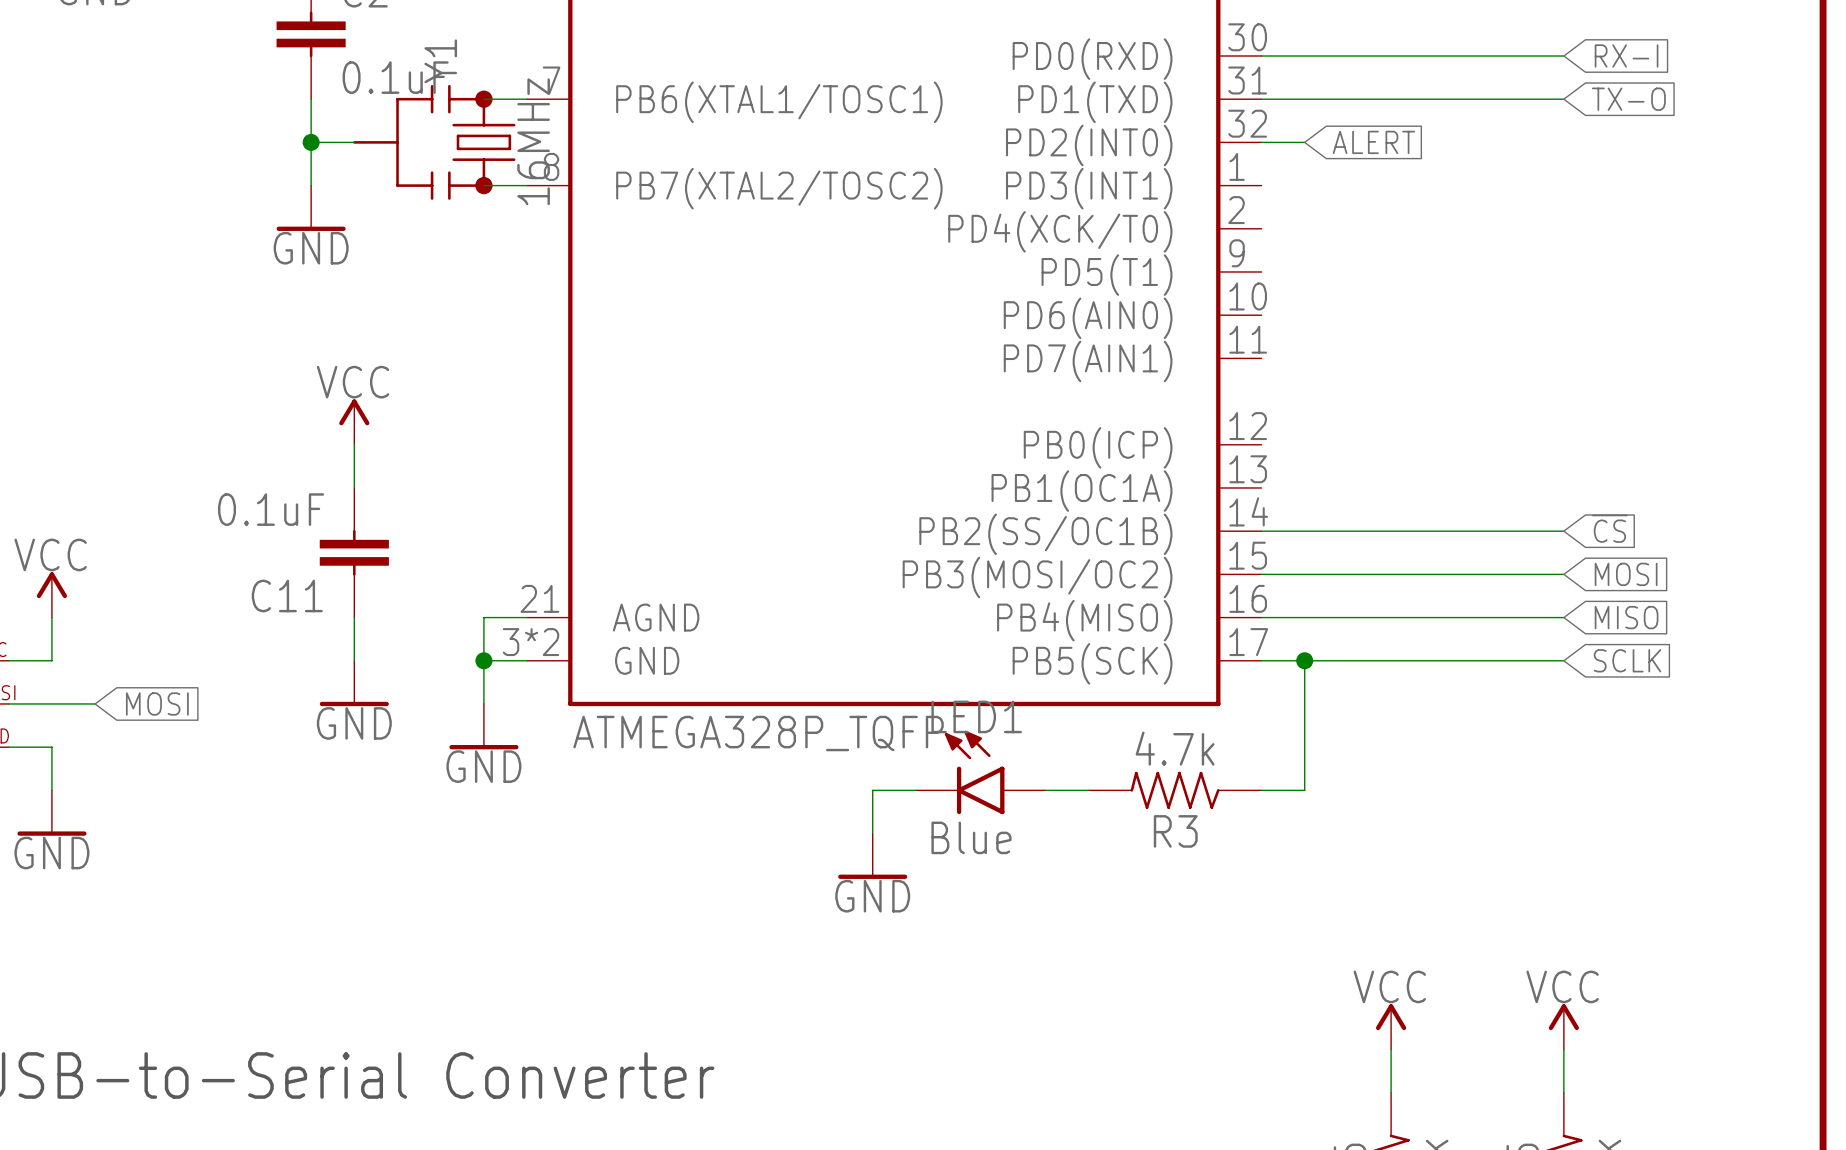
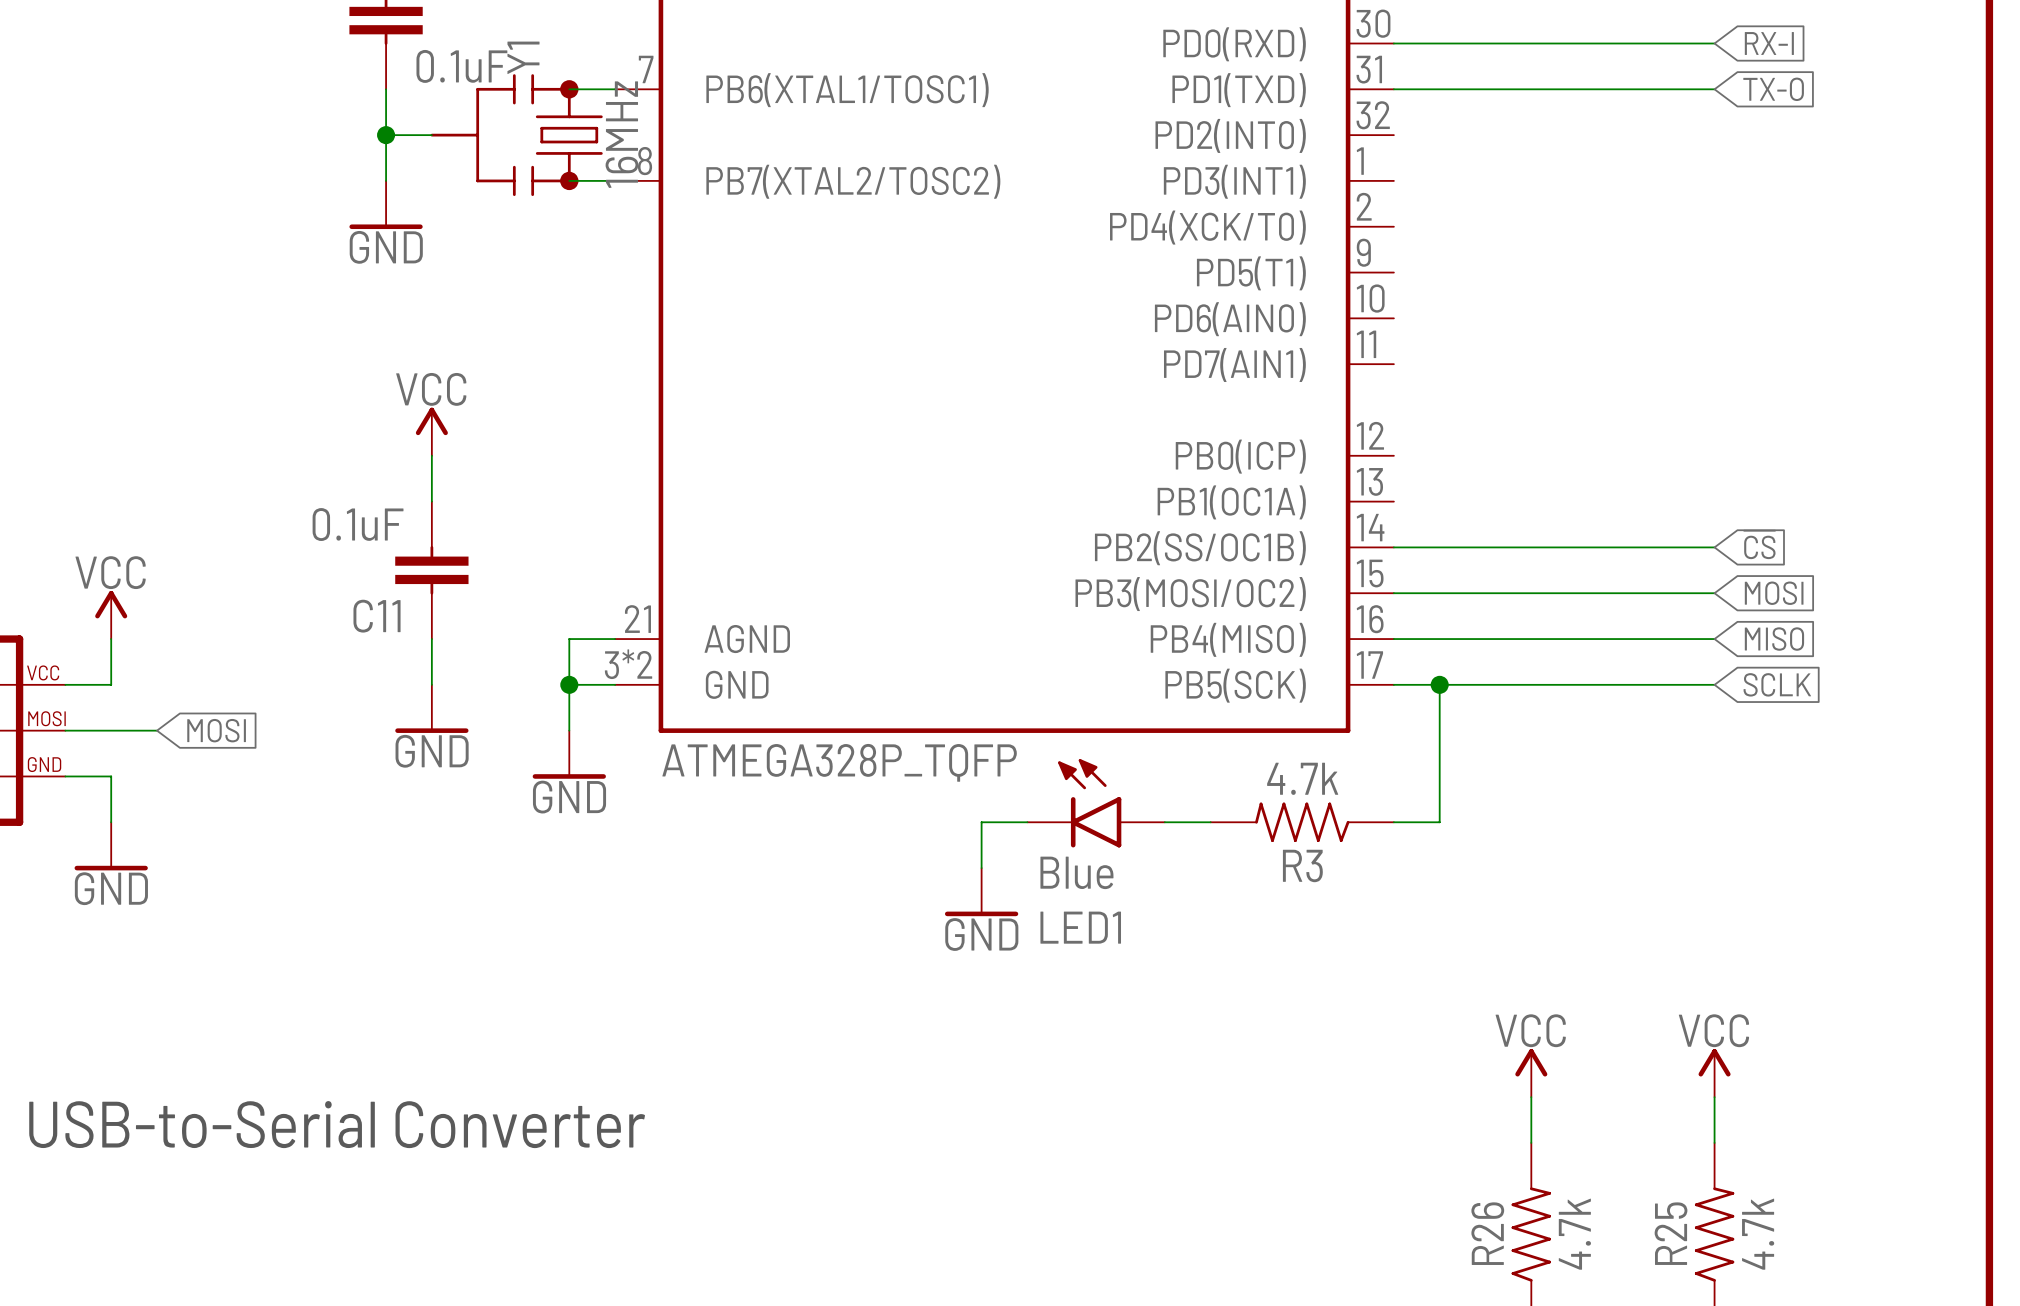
wire: (1261, 142) (1304, 142) -> none
global label: ALERT (1373, 142) -> none
LED1 name position: LED1 (976, 716) -> LED1 (1080, 927)

